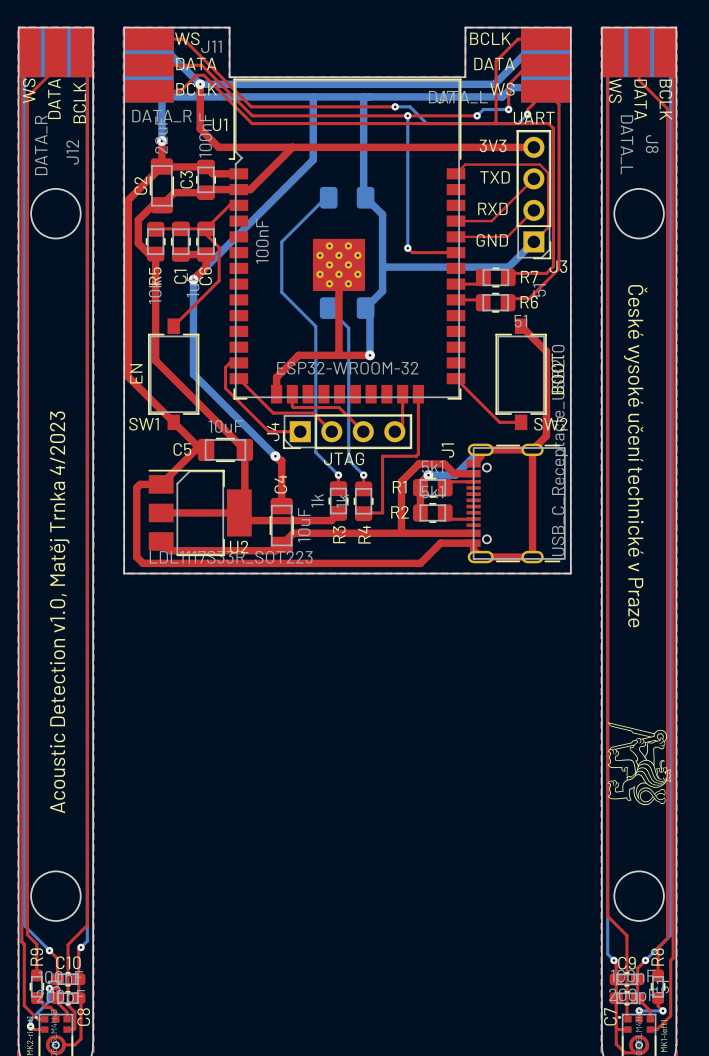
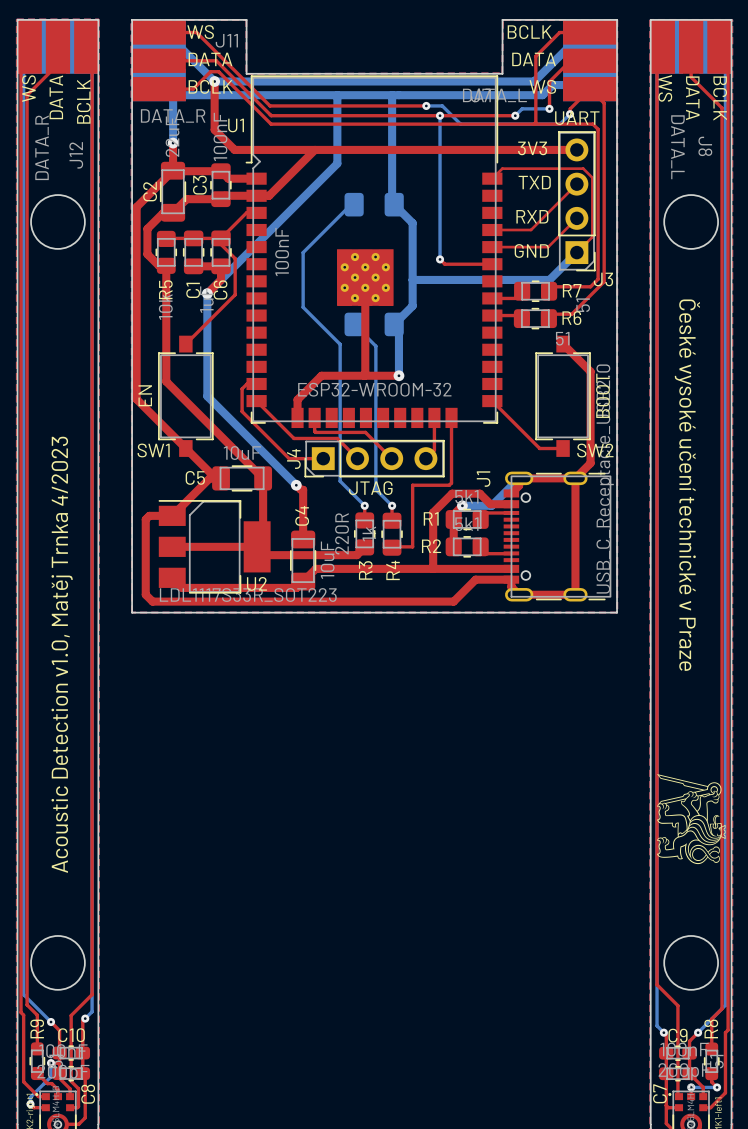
R3 value: 1k (317, 500) -> 220R (342, 533)

